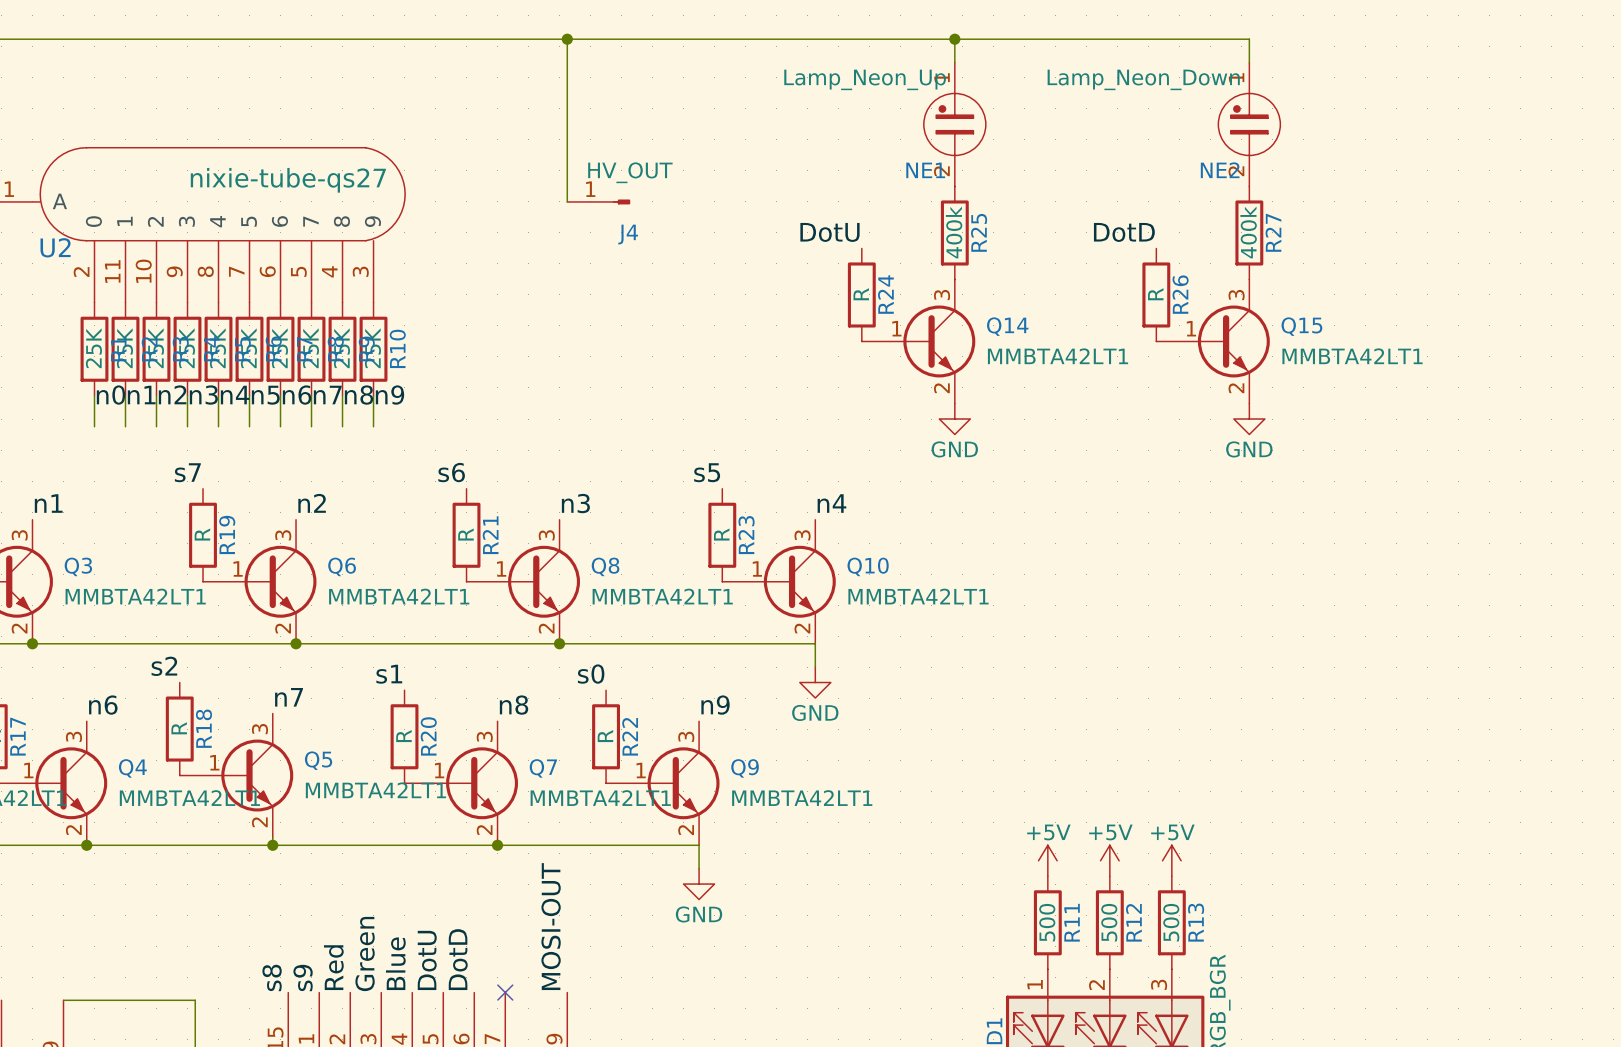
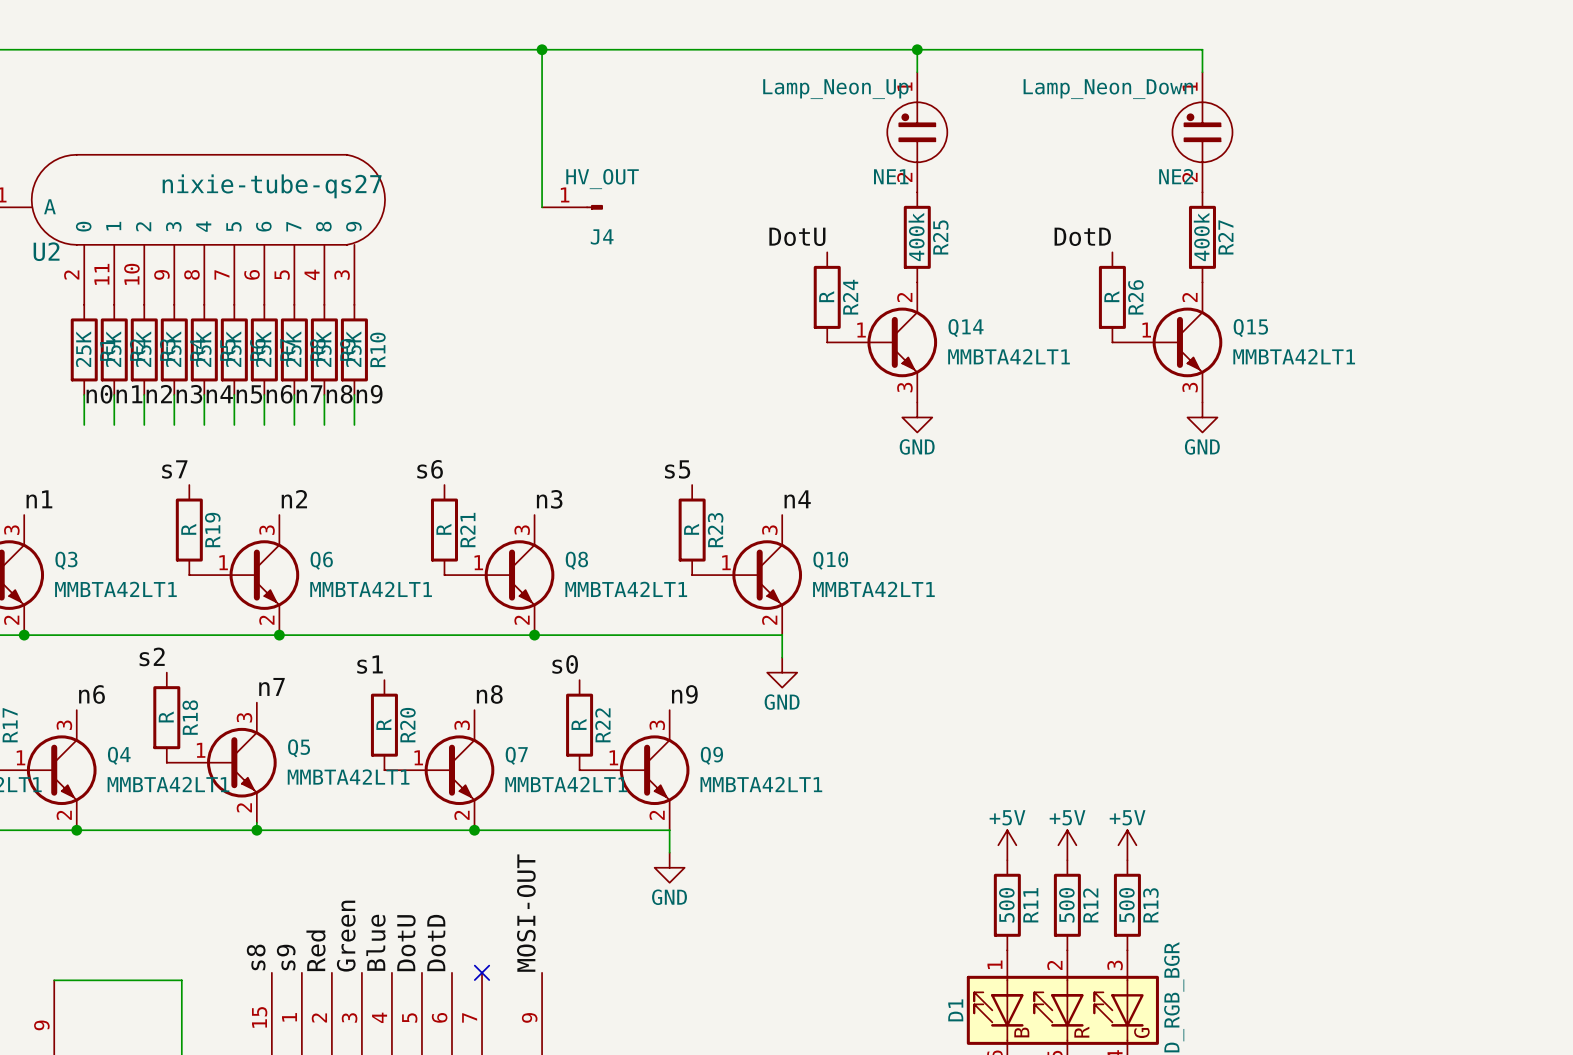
Q14 pin number: 3 (942, 295) -> 2 (904, 297)
Q15 pin number: 3 (1236, 295) -> 2 (1189, 297)
Q14 pin number: 2 (941, 388) -> 3 (904, 387)
Q15 pin number: 2 (1236, 388) -> 3 (1190, 387)

